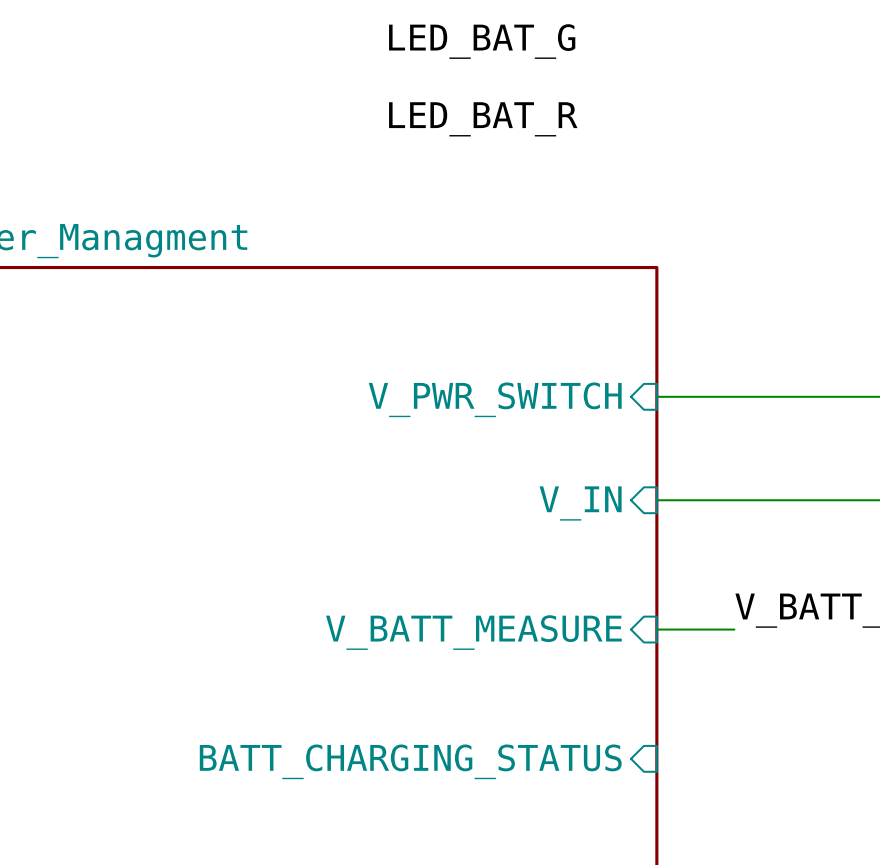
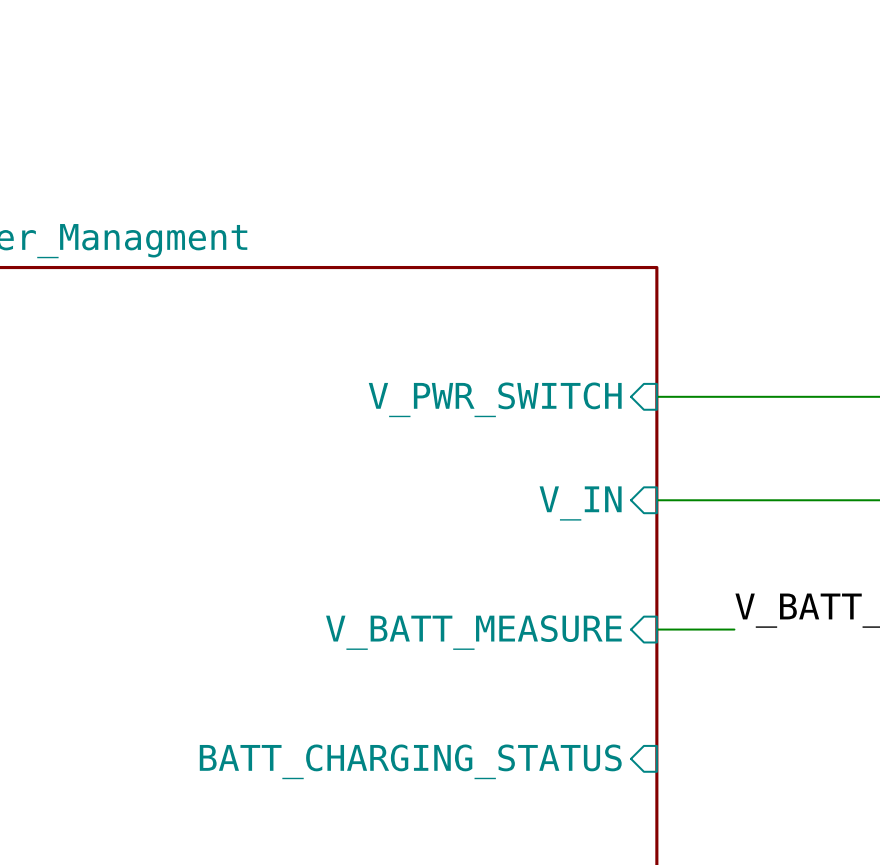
label: LED_BAT_G (482, 41) -> none
label: LED_BAT_R (483, 119) -> none

